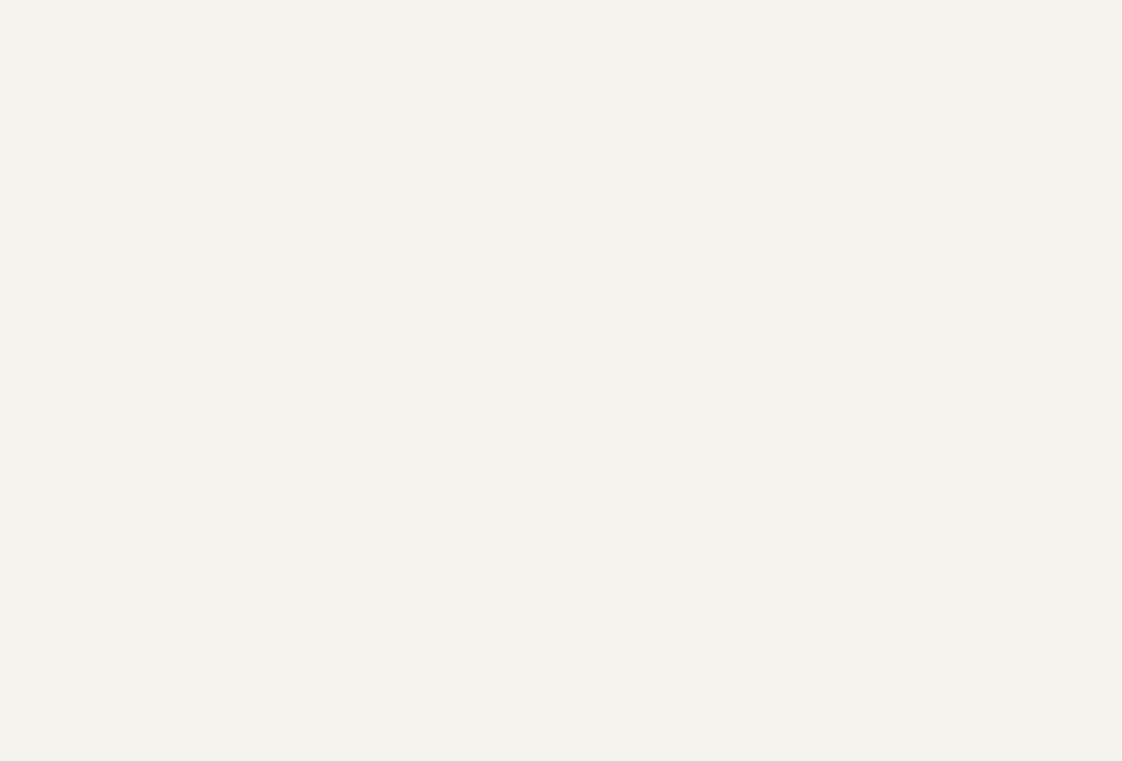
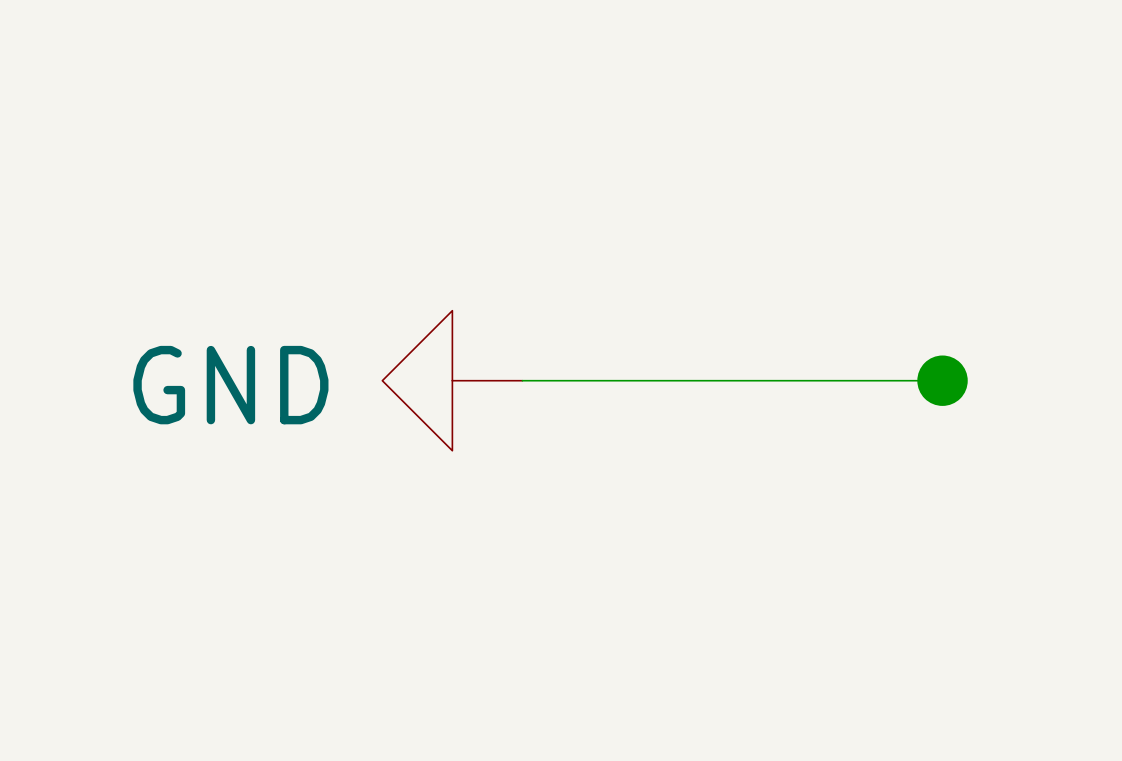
power symbol: none -> GND (452, 380)
wire: none -> (522, 380) (942, 380)
junction: none -> (942, 380)

